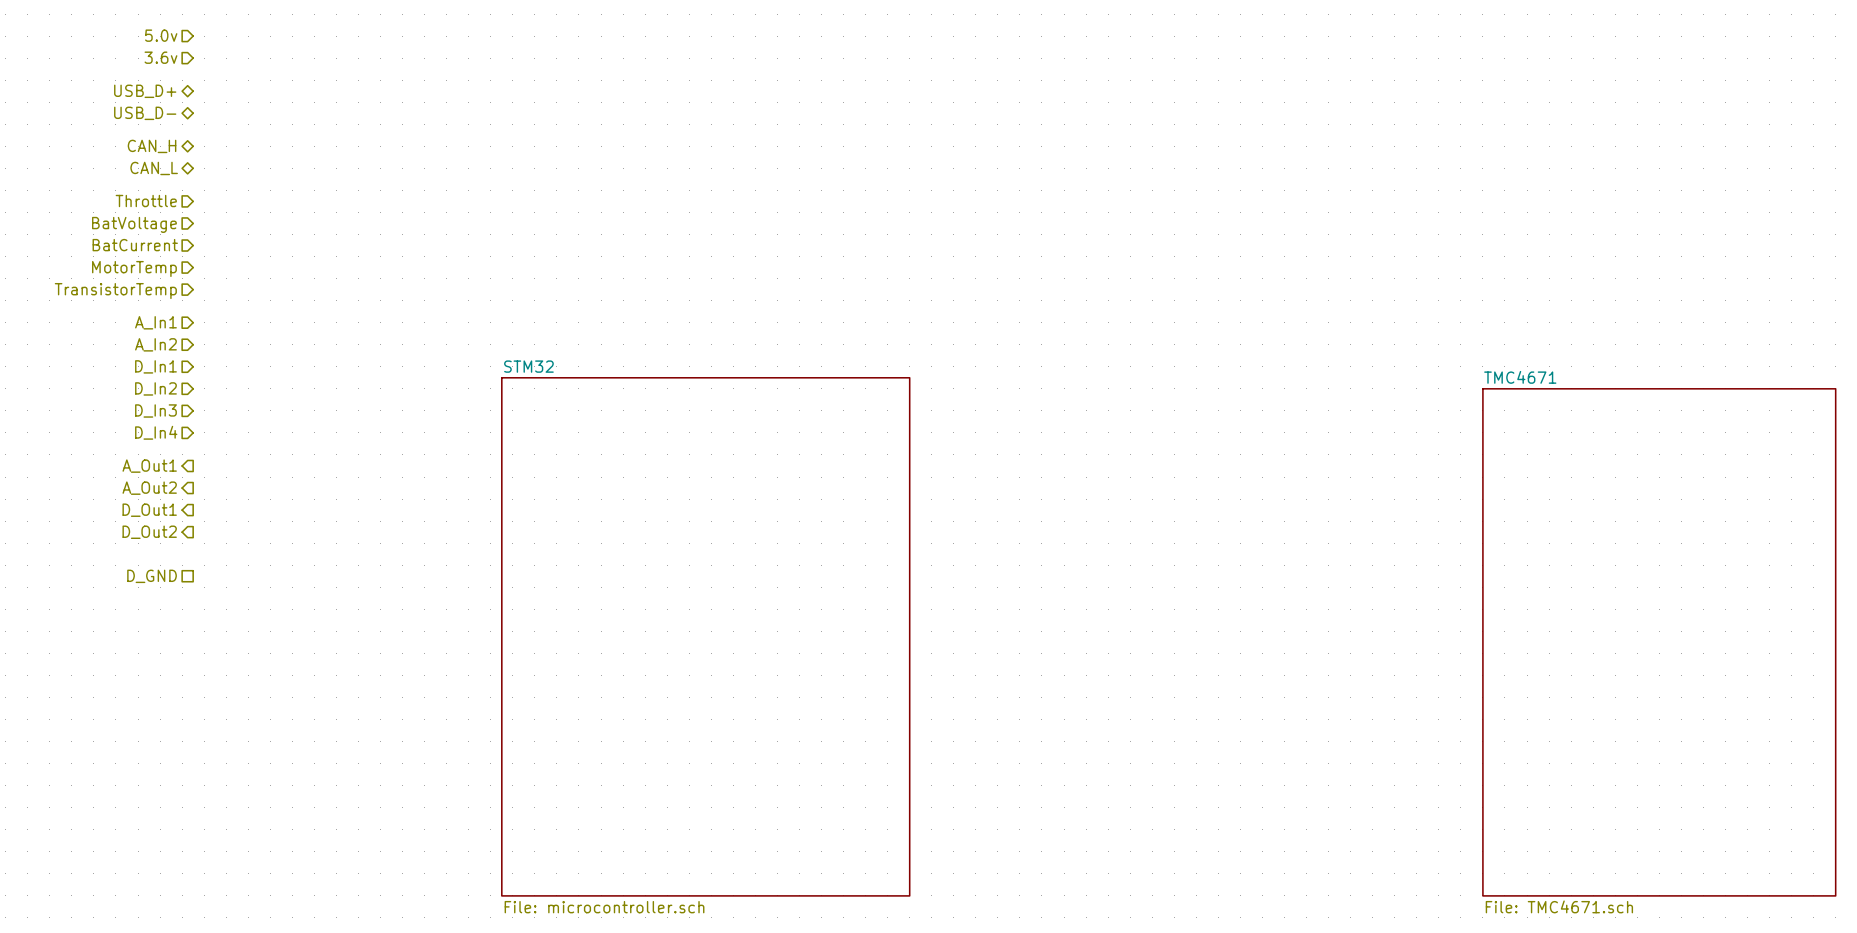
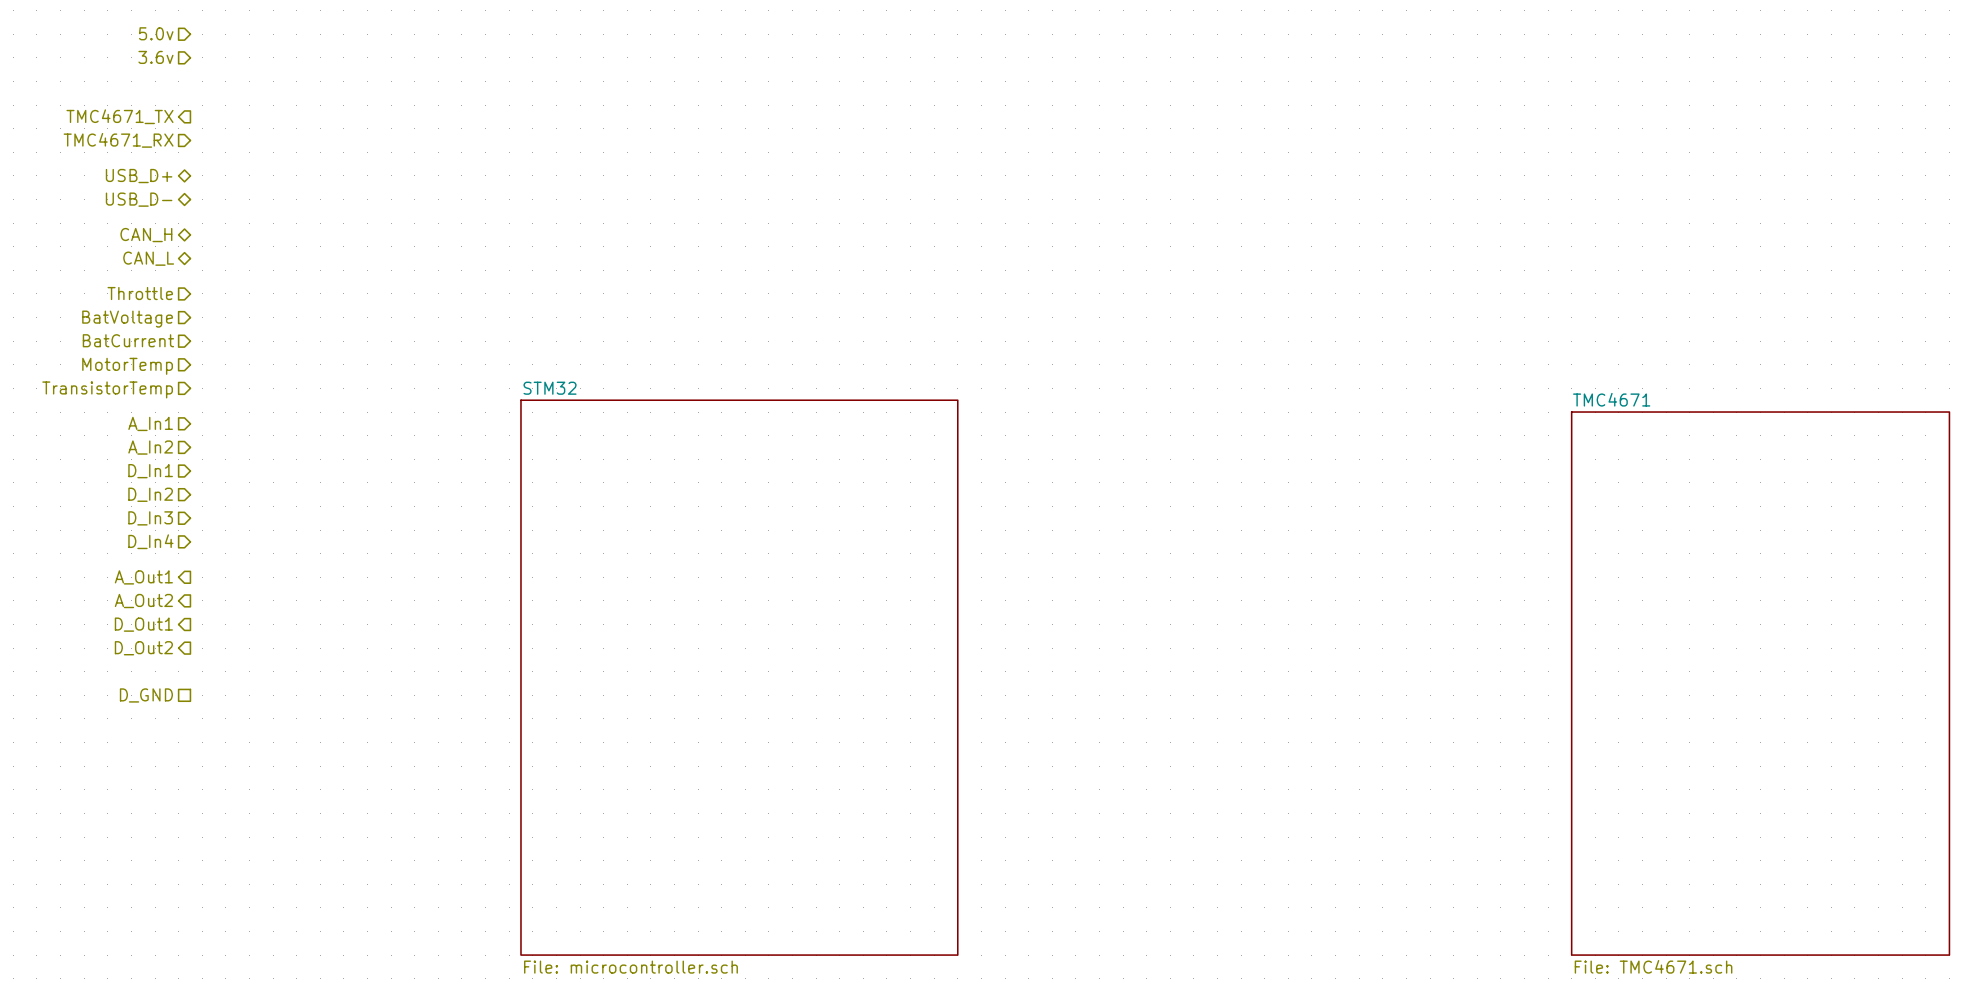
hierarchical label: USB_D+ (145, 91) -> none
hierarchical label shape: bidirectional (145, 113) -> output (119, 116)
hierarchical label: USB_D- (145, 113) -> TMC4671_TX (119, 116)
hierarchical label: none -> TMC4671_RX (118, 140)
hierarchical label: CAN_H (152, 146) -> none
hierarchical label: CAN_L (154, 168) -> USB_D+ (139, 176)
hierarchical label: none -> USB_D- (139, 199)
hierarchical label position: Throttle (146, 201) -> Throttle (140, 293)
hierarchical label shape: input (134, 224) -> bidirectional (146, 235)
hierarchical label: BatVoltage (134, 224) -> CAN_H (146, 235)
hierarchical label shape: input (135, 245) -> bidirectional (148, 258)
hierarchical label: BatCurrent (135, 245) -> CAN_L (148, 258)
hierarchical label: MotorTemp (134, 268) -> none
hierarchical label: TransistorTemp (115, 291) -> none
hierarchical label: none -> BatVoltage (127, 319)
hierarchical label: A_In1 (155, 322) -> BatCurrent (128, 340)
hierarchical label: A_In2 (155, 344) -> MotorTemp (127, 366)
hierarchical label: D_In1 (155, 366) -> TransistorTemp (107, 389)
hierarchical label: D_In2 (155, 388) -> none
hierarchical label: none -> A_In1 (150, 423)
hierarchical label: D_In3 (155, 410) -> none
hierarchical label: none -> A_In2 (150, 447)
hierarchical label: D_In4 (156, 432) -> D_In1 (150, 471)
hierarchical label shape: output (149, 466) -> input (150, 494)
hierarchical label: A_Out1 (149, 466) -> D_In2 (150, 494)
hierarchical label shape: output (149, 488) -> input (150, 518)
hierarchical label: A_Out2 (149, 488) -> D_In3 (150, 518)
hierarchical label shape: output (149, 510) -> input (150, 541)
hierarchical label: D_Out1 (149, 510) -> D_In4 (150, 541)
hierarchical label position: D_Out2 (149, 532) -> D_Out2 (143, 648)
hierarchical label: none -> A_Out1 (143, 577)
hierarchical label: none -> A_Out2 (143, 601)
hierarchical label position: D_GND (152, 576) -> D_GND (146, 695)
hierarchical label: none -> D_Out1 (143, 624)

